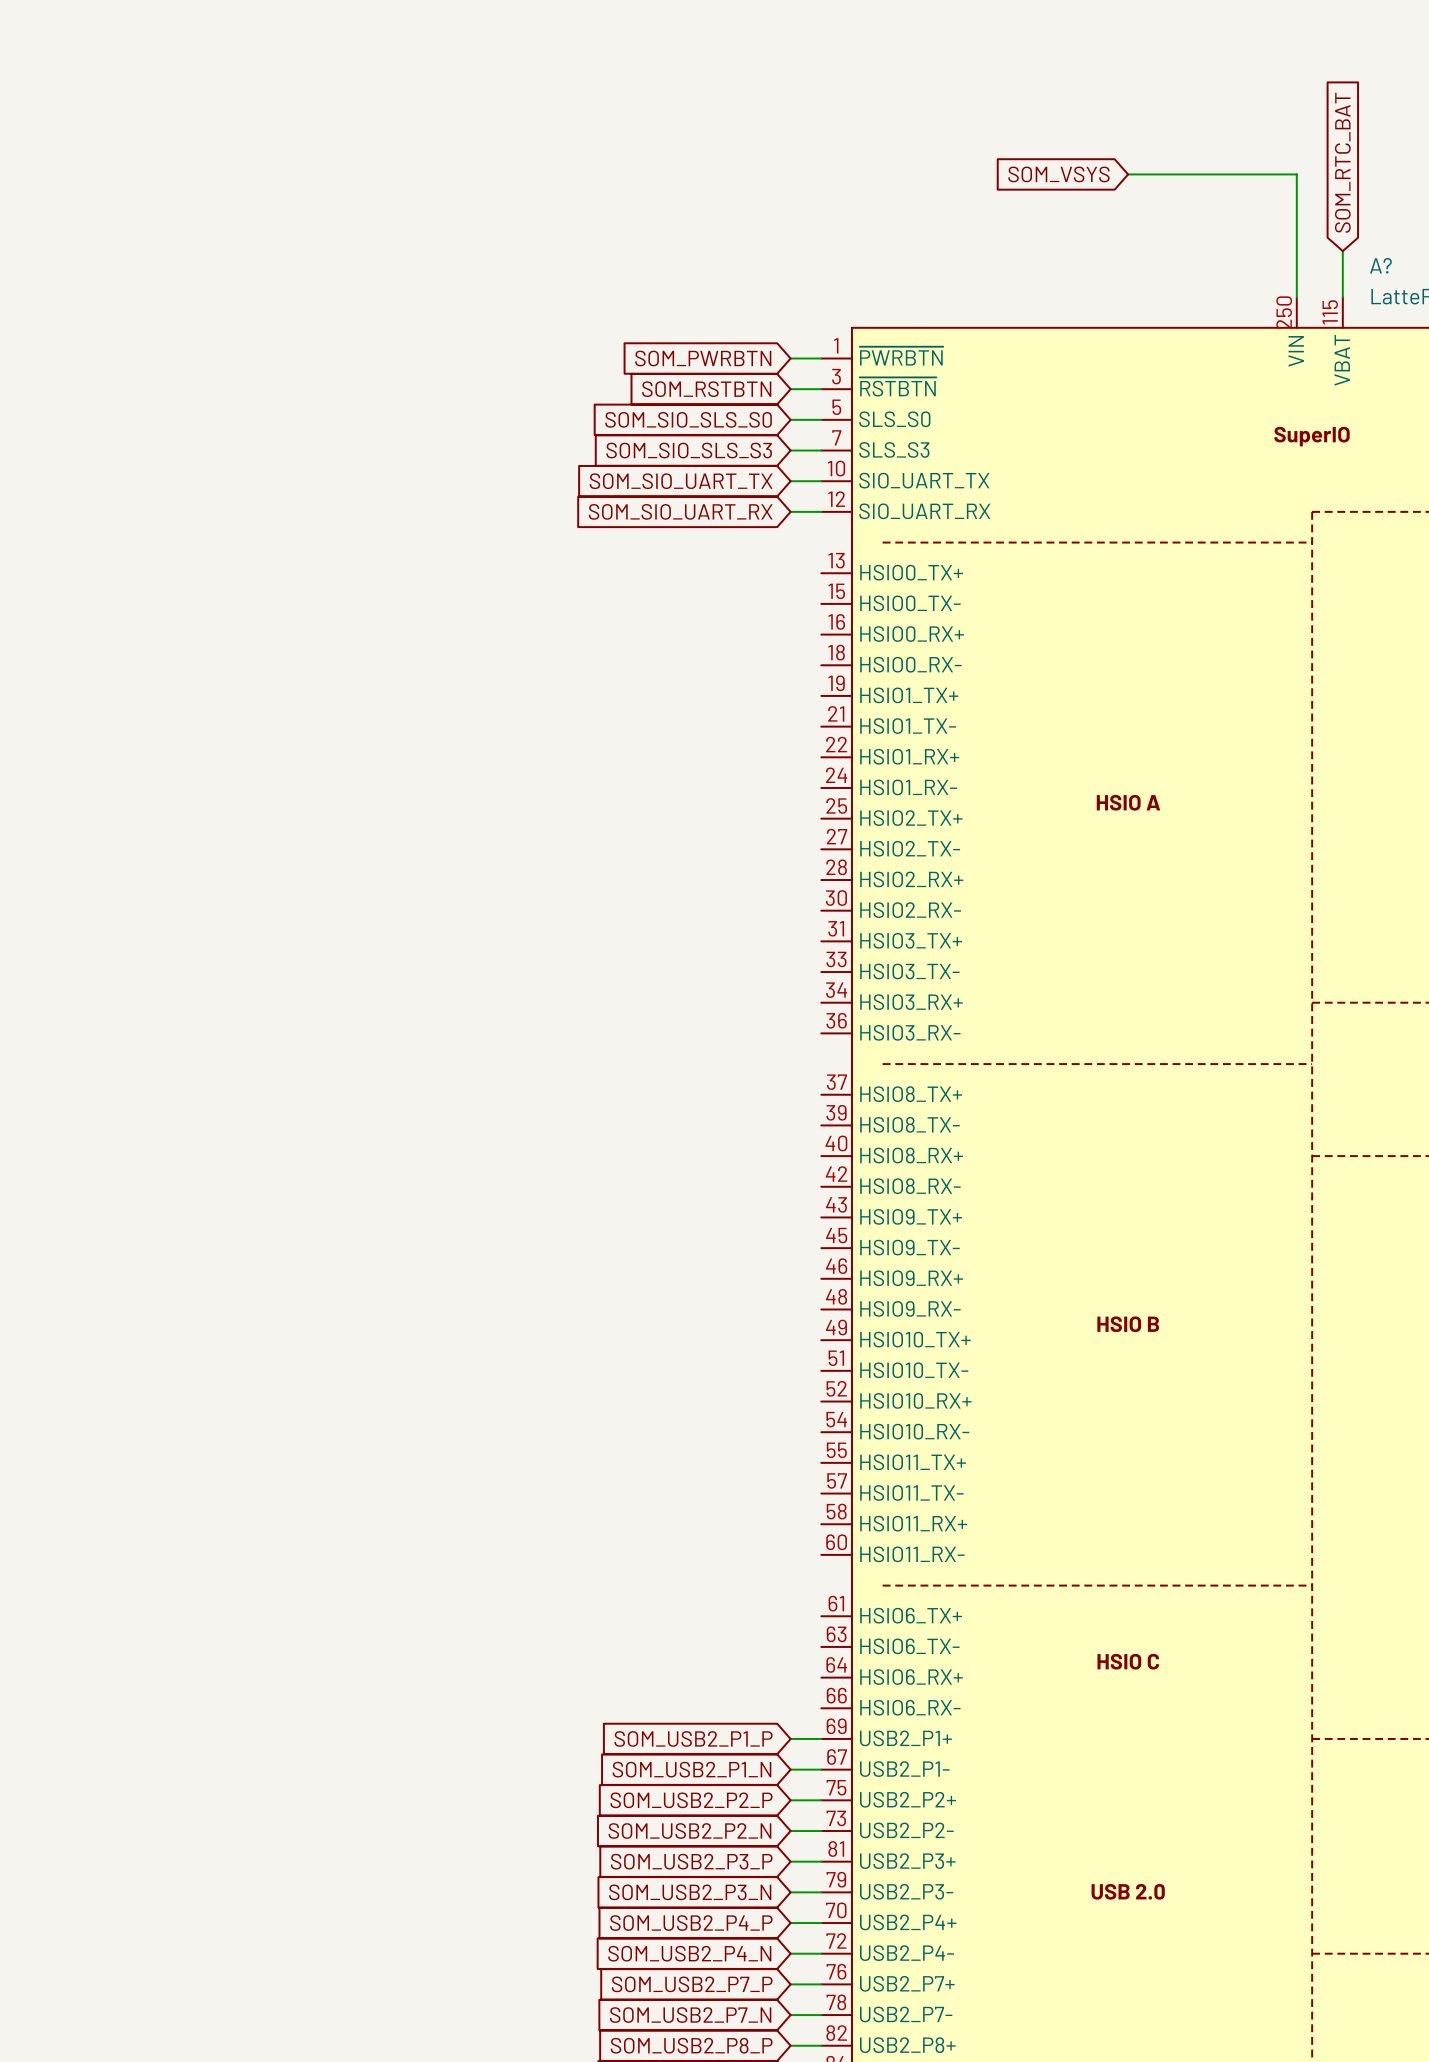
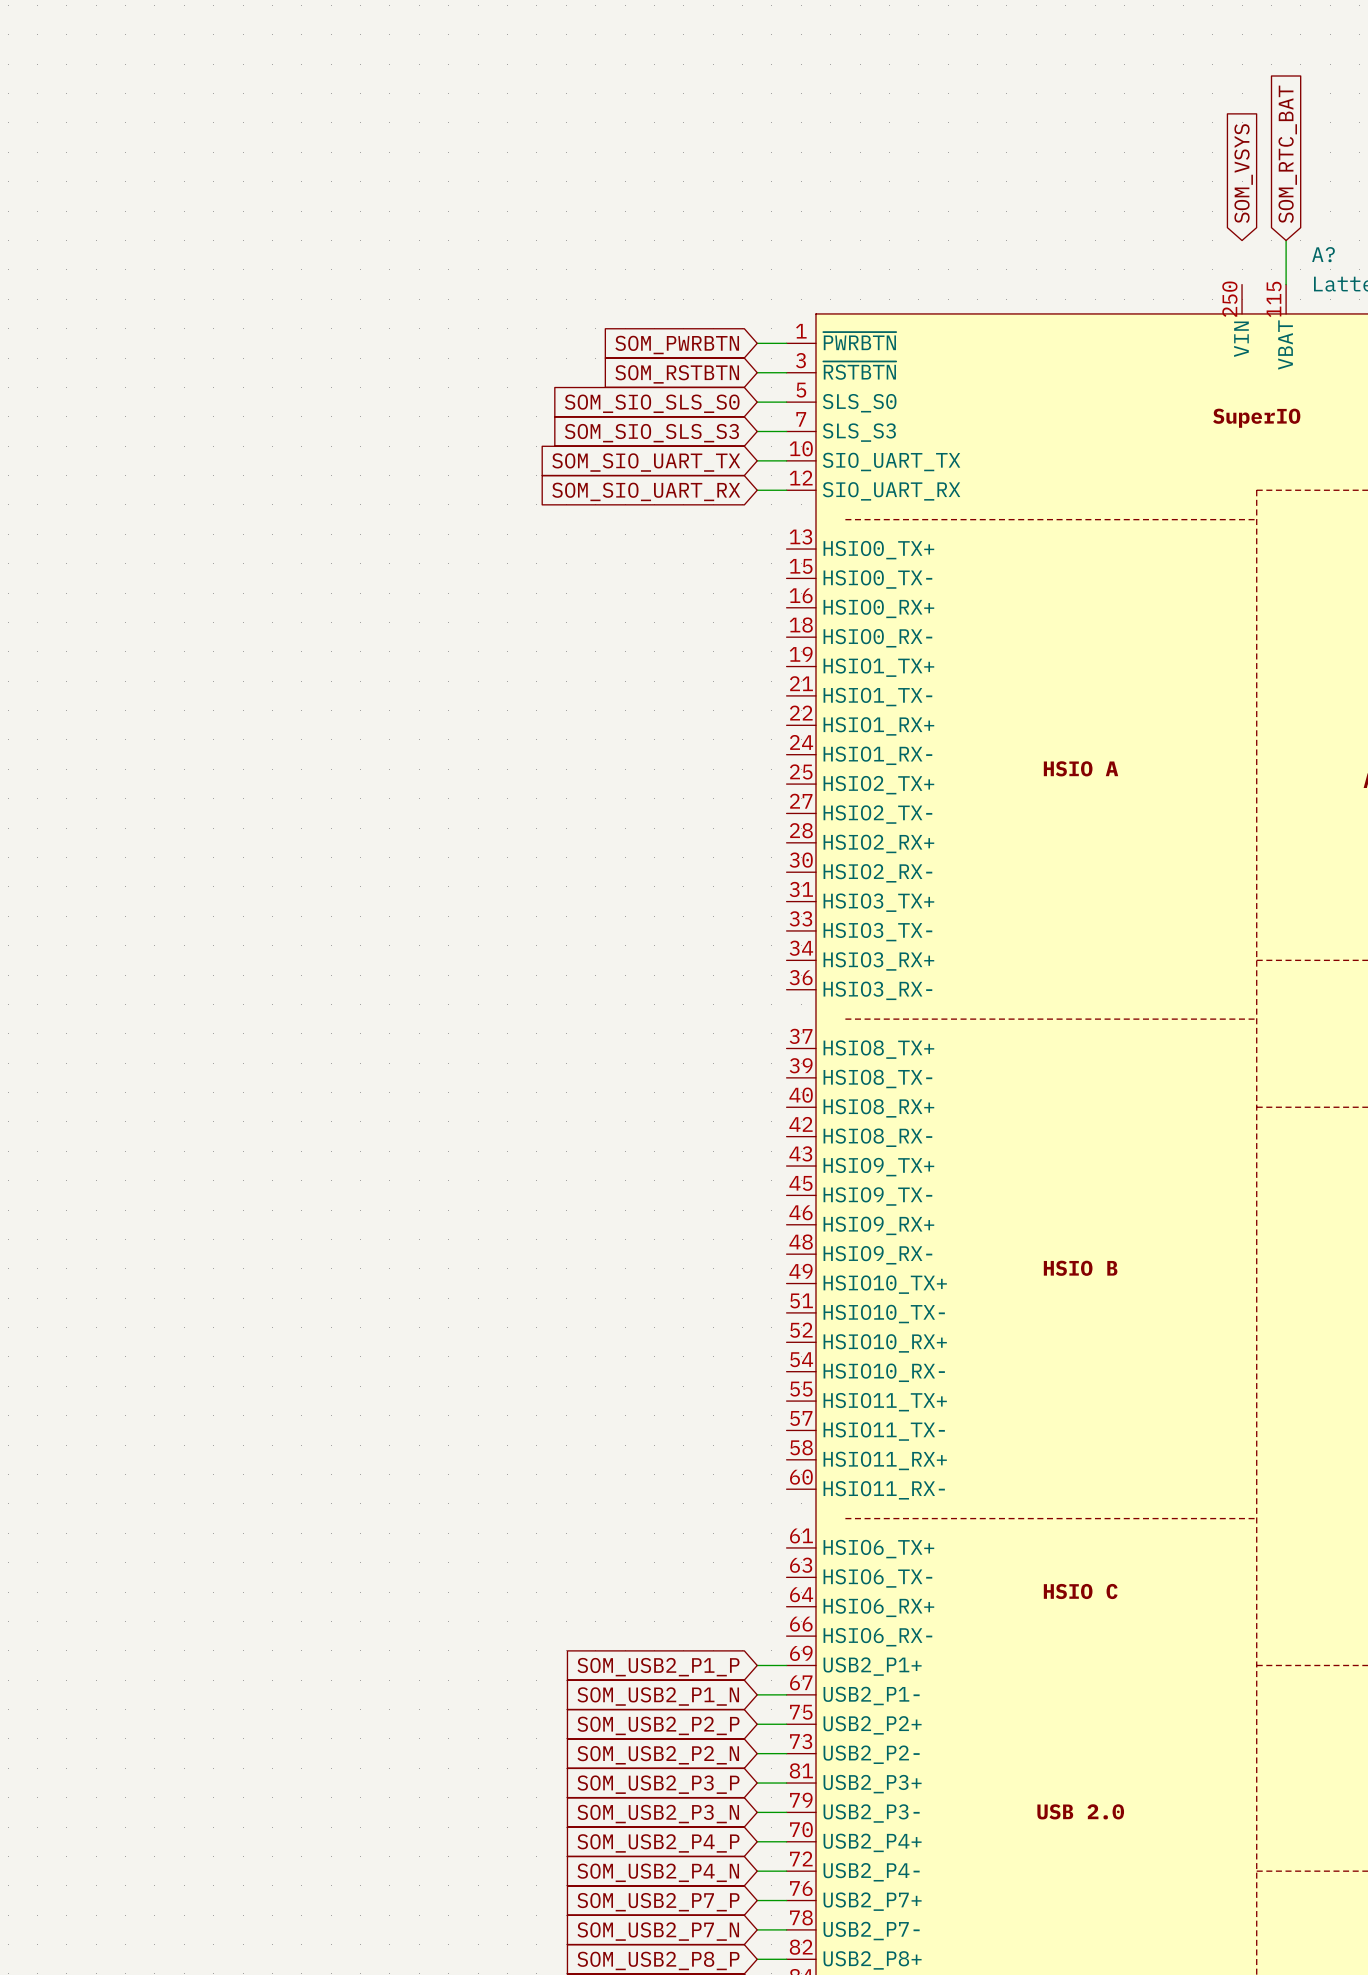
global label rotation: 0° (1059, 174) -> 90° clockwise (1243, 173)
global label position: SOM_VSYS (1059, 174) -> SOM_VSYS (1243, 173)
wire: (1128, 174) (1296, 174) (1296, 297) -> none

